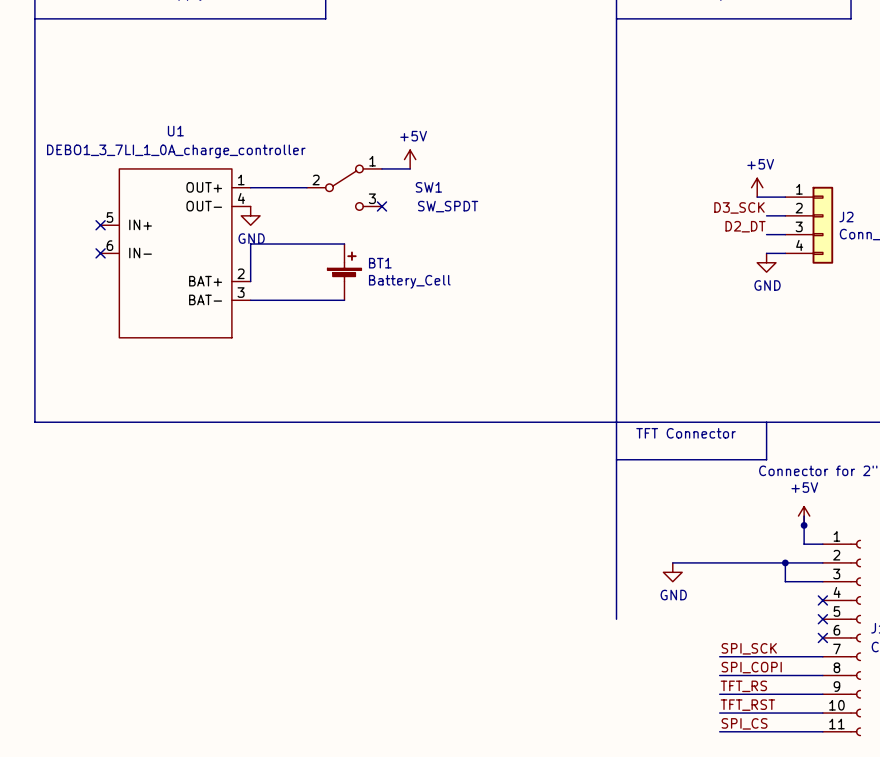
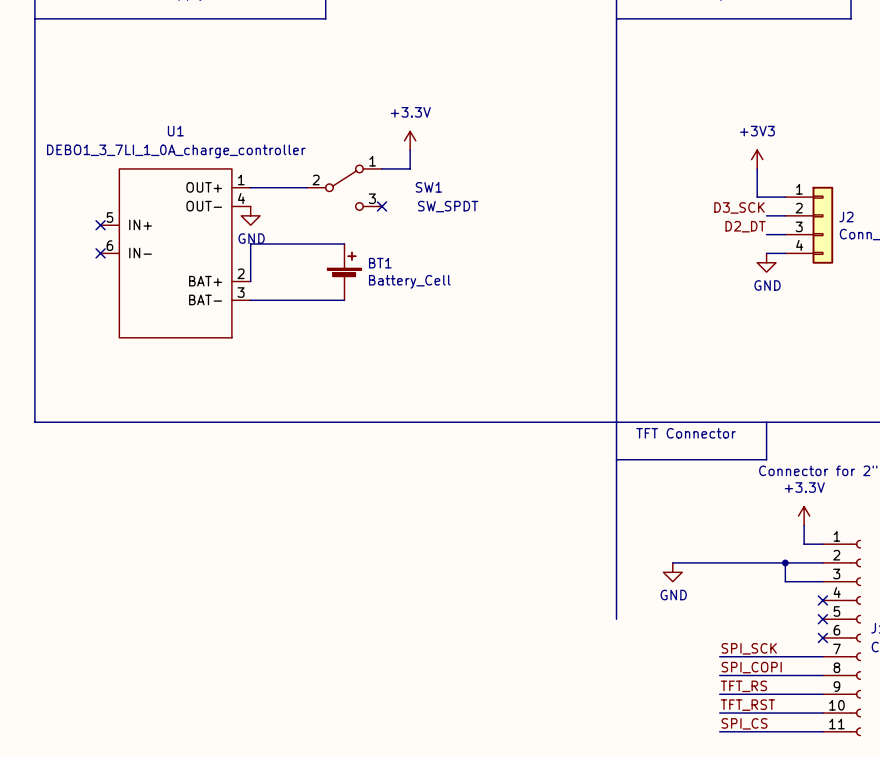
power symbol: none -> +3.3V (410, 140)
power symbol: +5V (410, 159) -> none
power symbol: none -> +3V3 (757, 159)
power symbol: +5V (757, 187) -> none
power symbol: +5V (804, 516) -> +3.3V (804, 516)
junction: (804, 525) -> none

